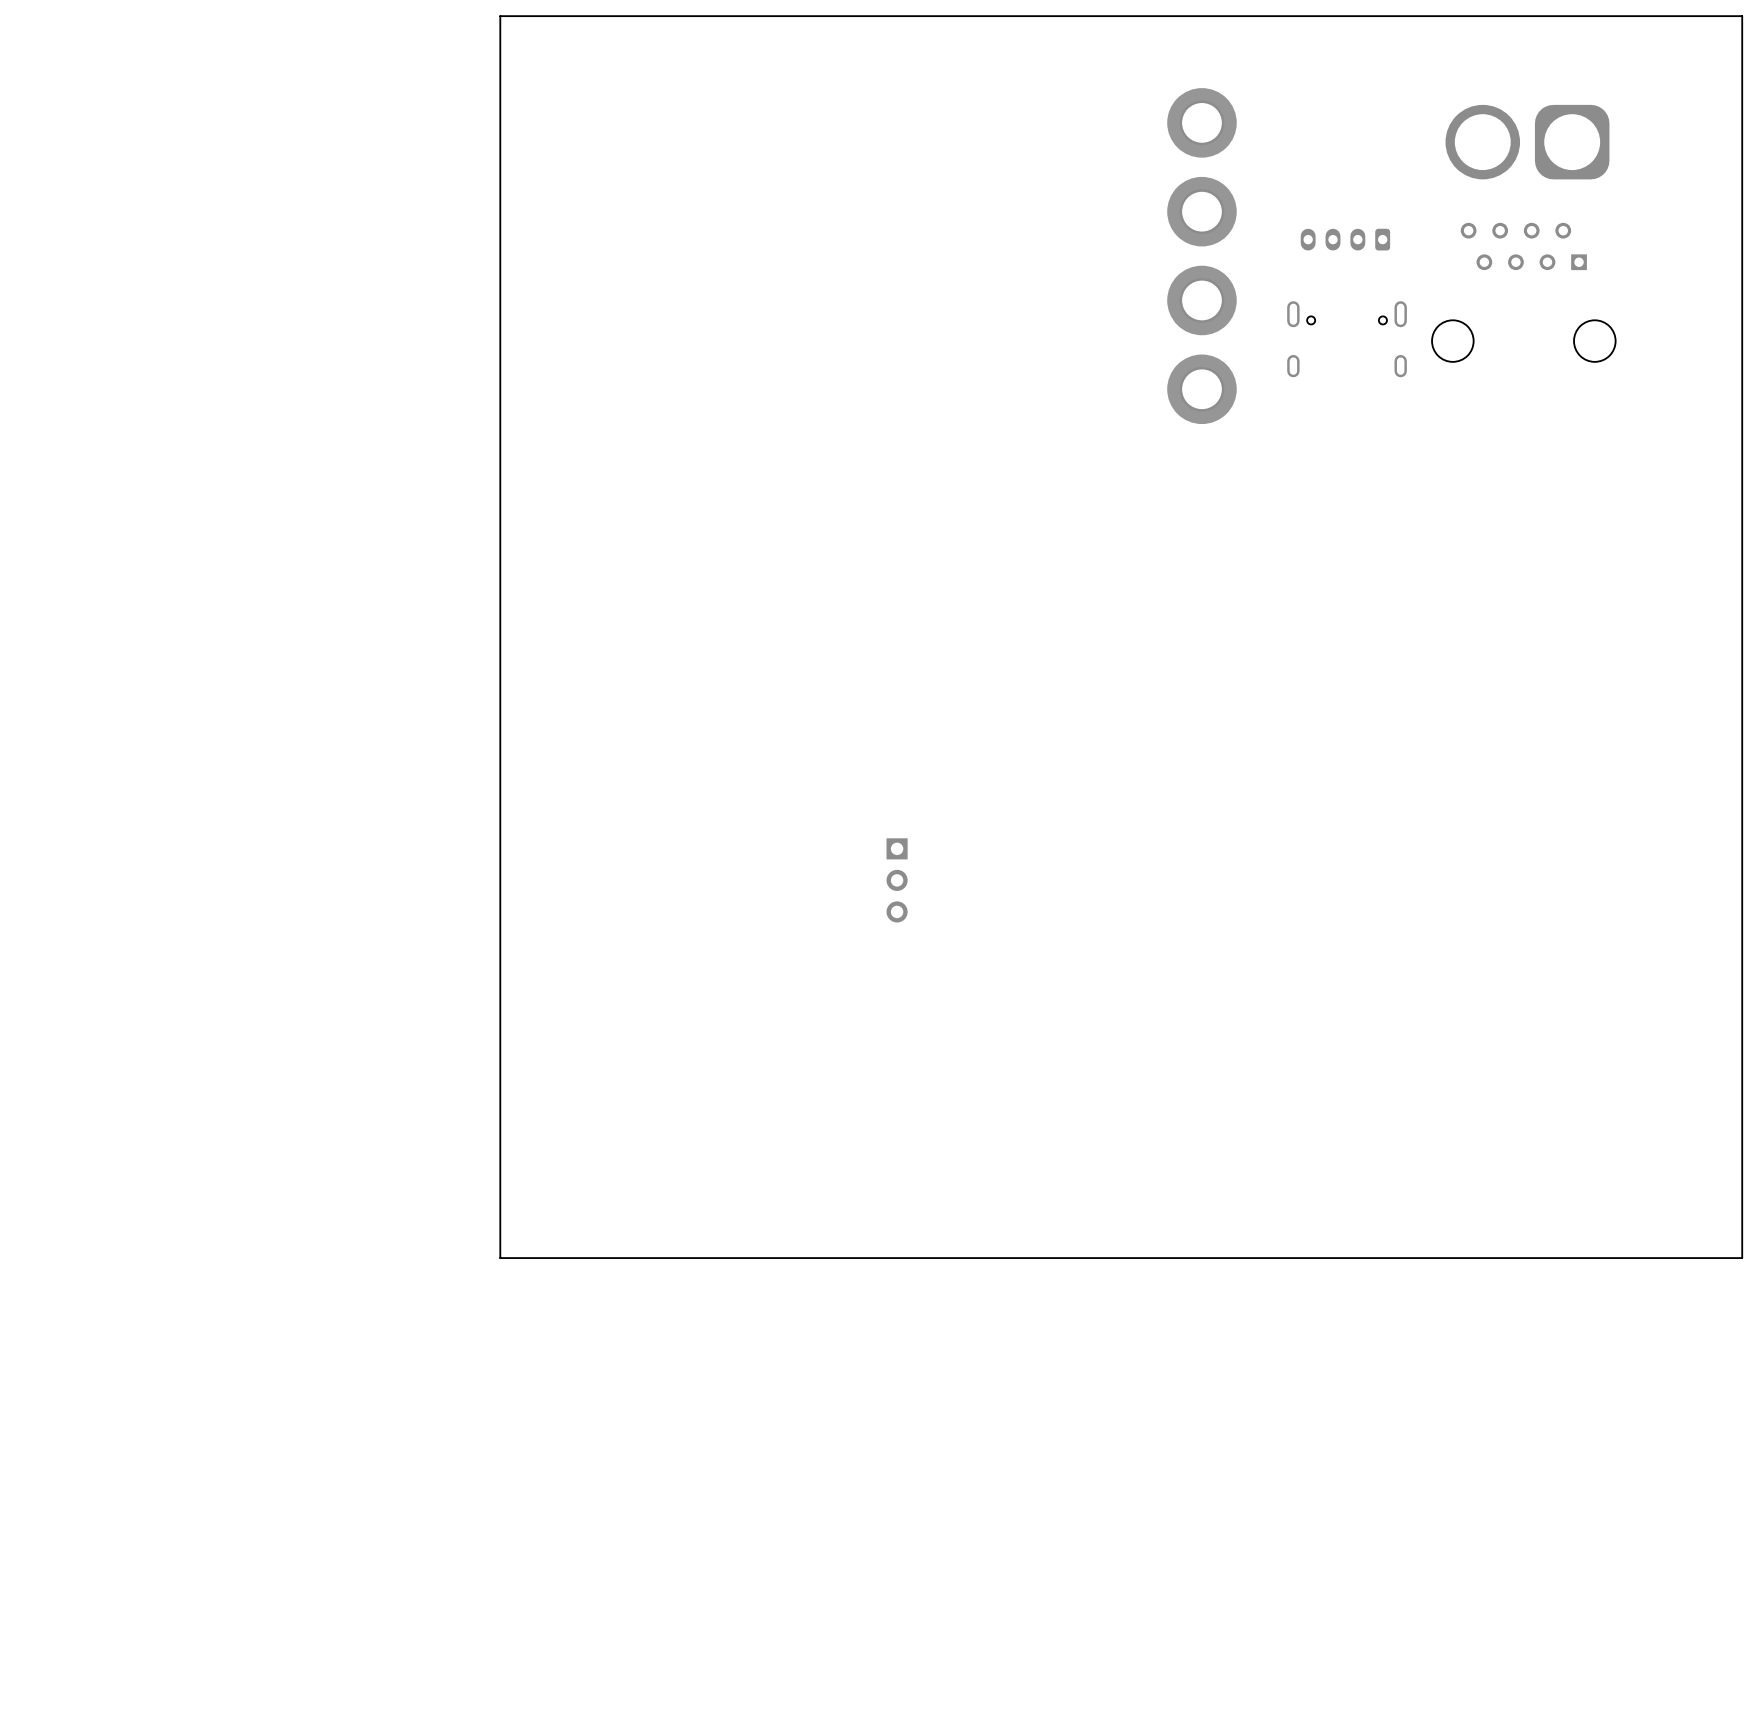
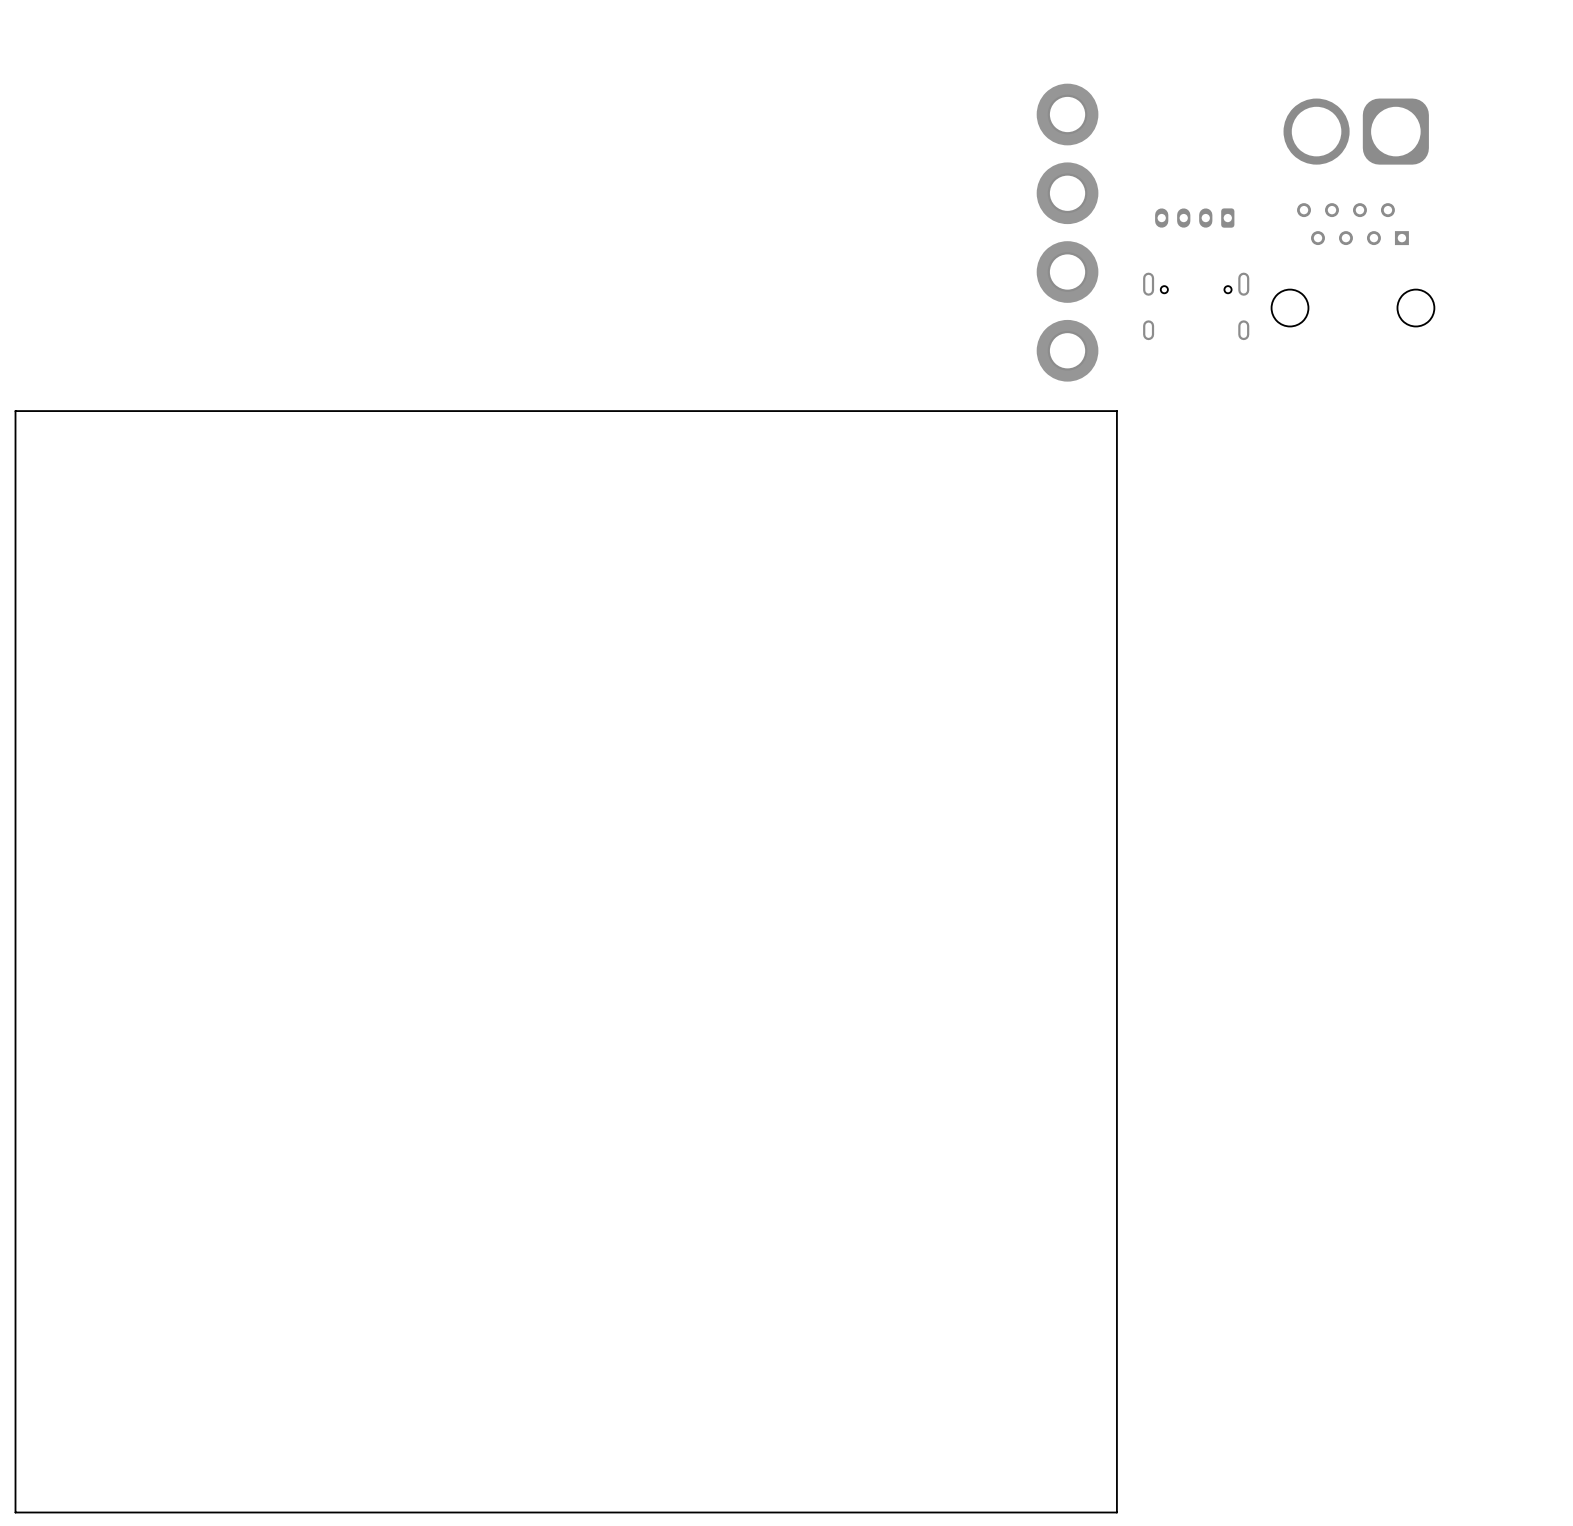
board edge: (1742, 16) (500, 16) (500, 1258) (1742, 1258) (1742, 16) -> none
board edge: none -> (1116, 411) (15, 411) (15, 1512) (1116, 1512) (1116, 411)
part: (897, 880) -> none

